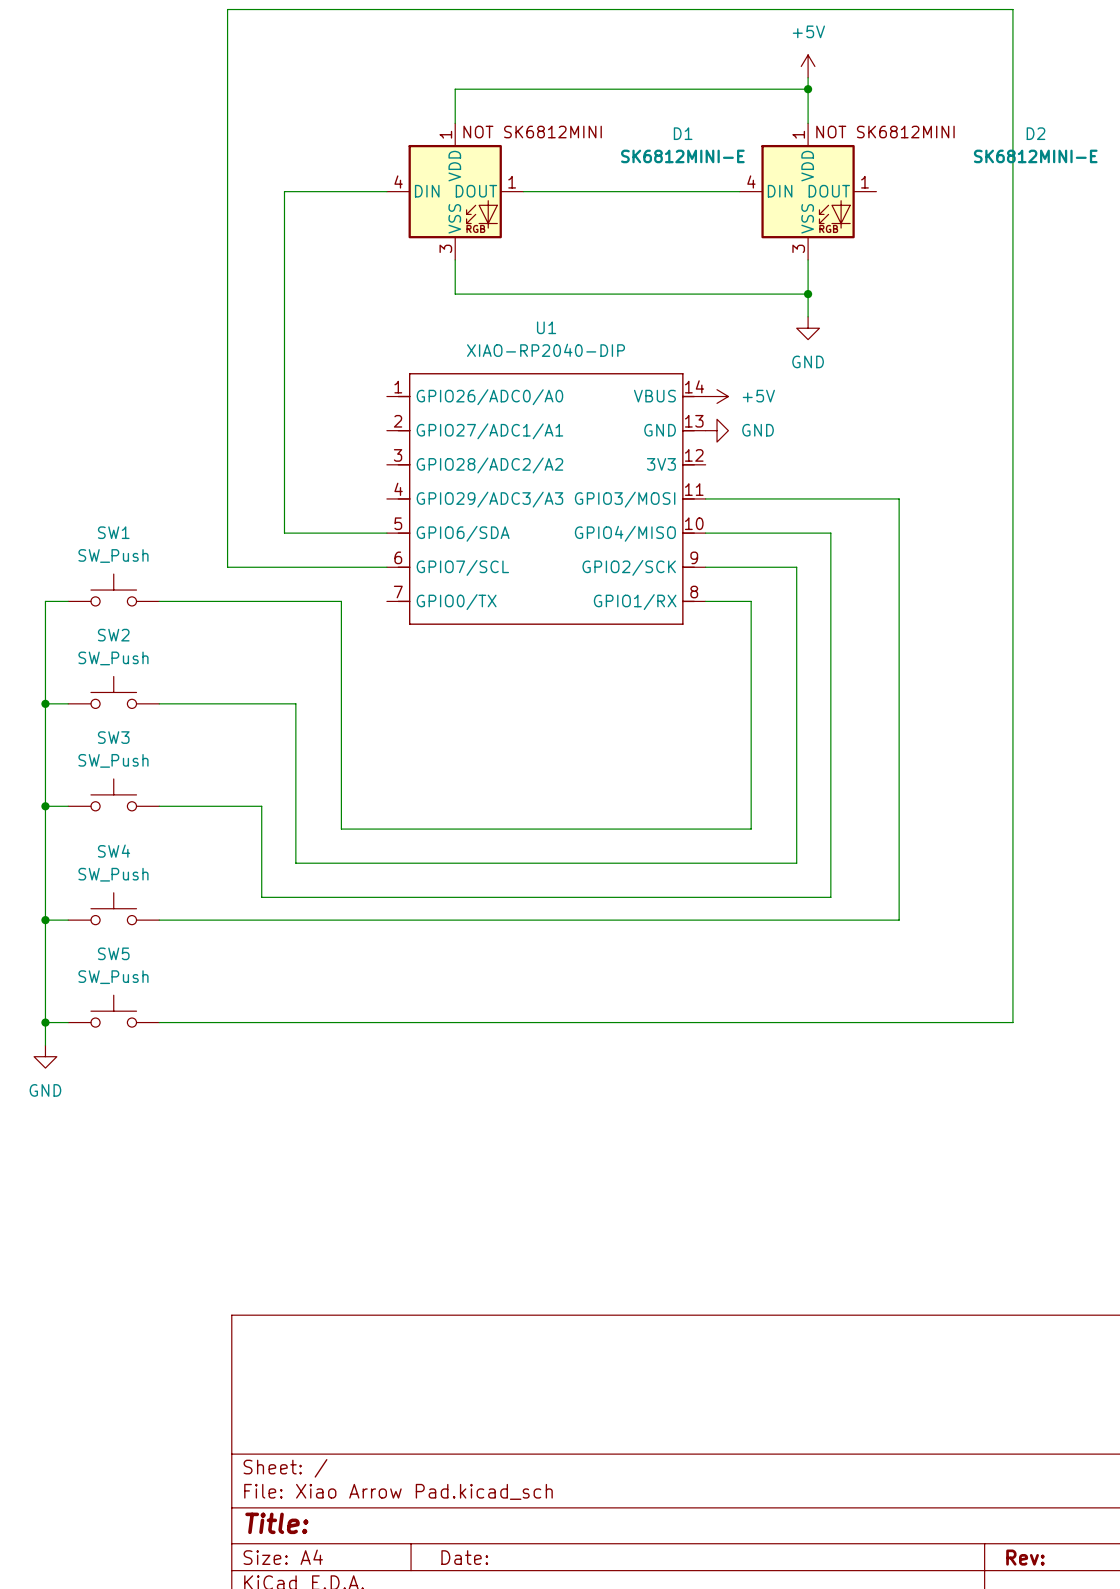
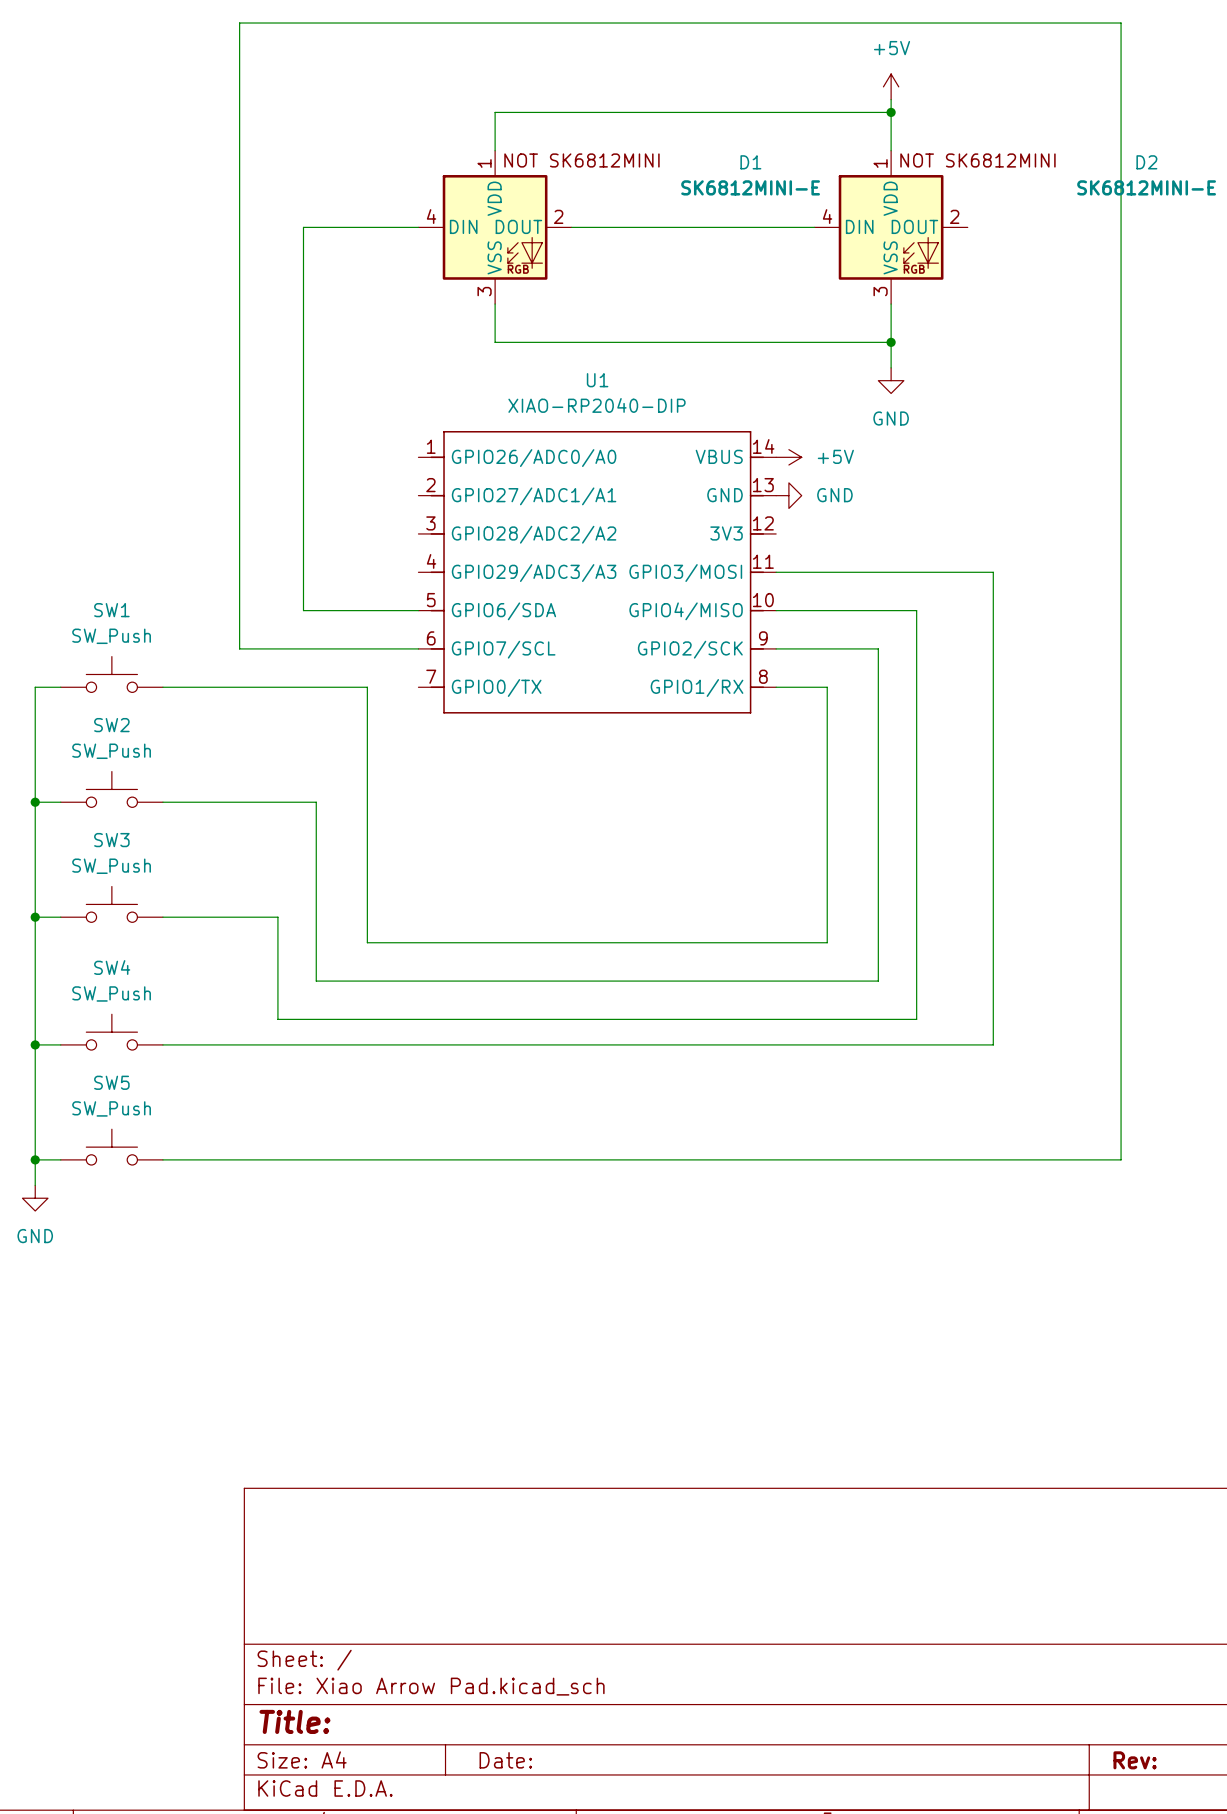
D1 pin number: 1 (512, 182) -> 2 (558, 216)
D2 pin number: 1 (864, 182) -> 2 (954, 216)

